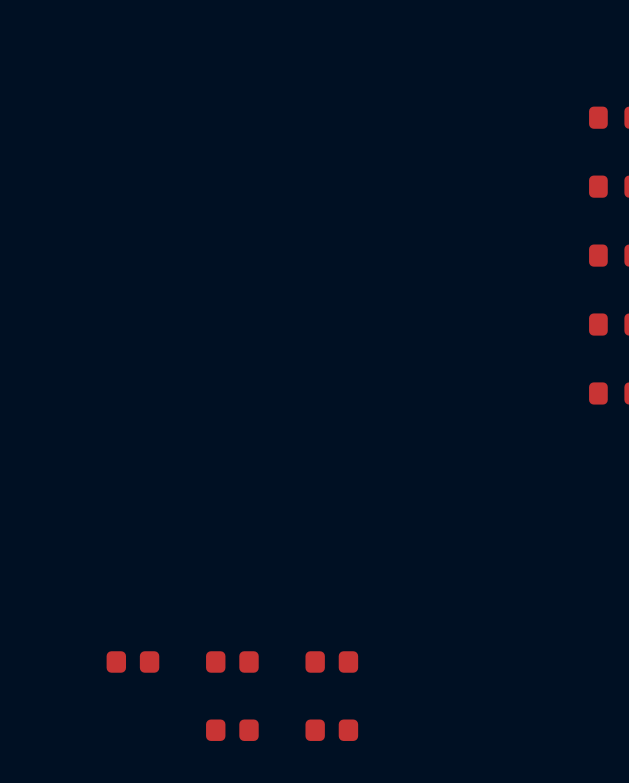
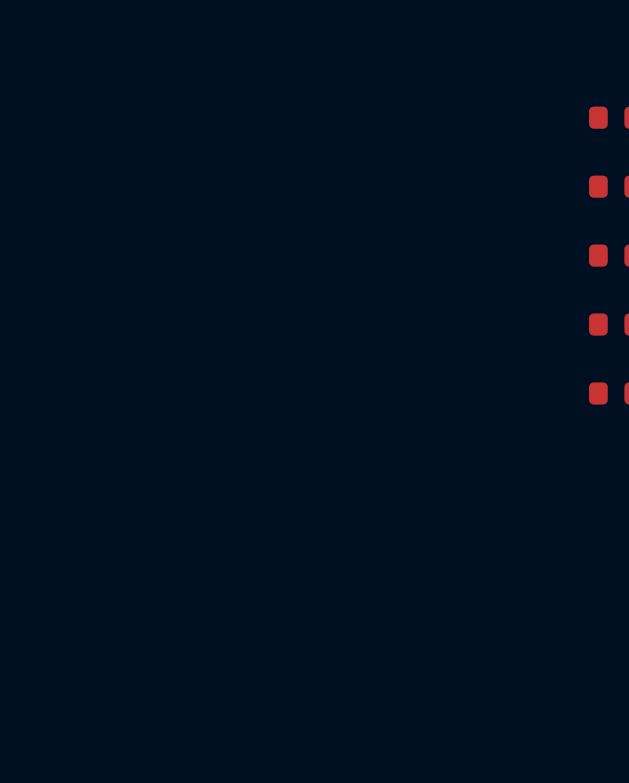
part: (132, 661) -> none
part: (232, 661) -> none
part: (331, 661) -> none
part: (232, 730) -> none
part: (331, 730) -> none

